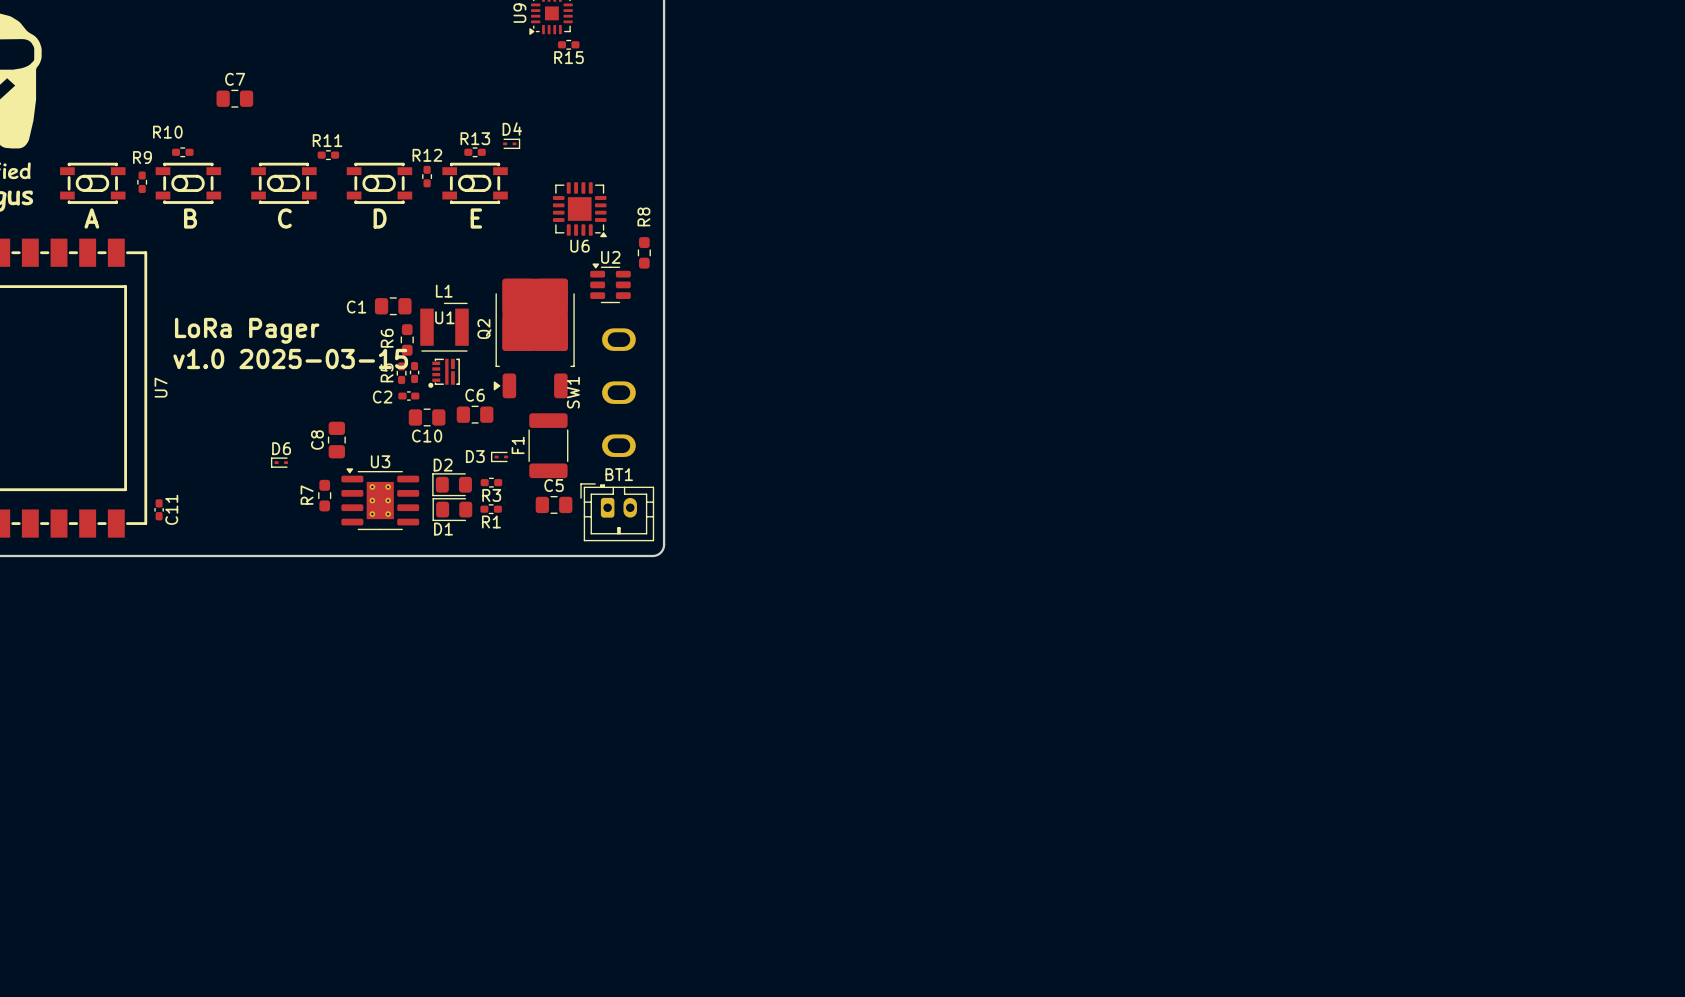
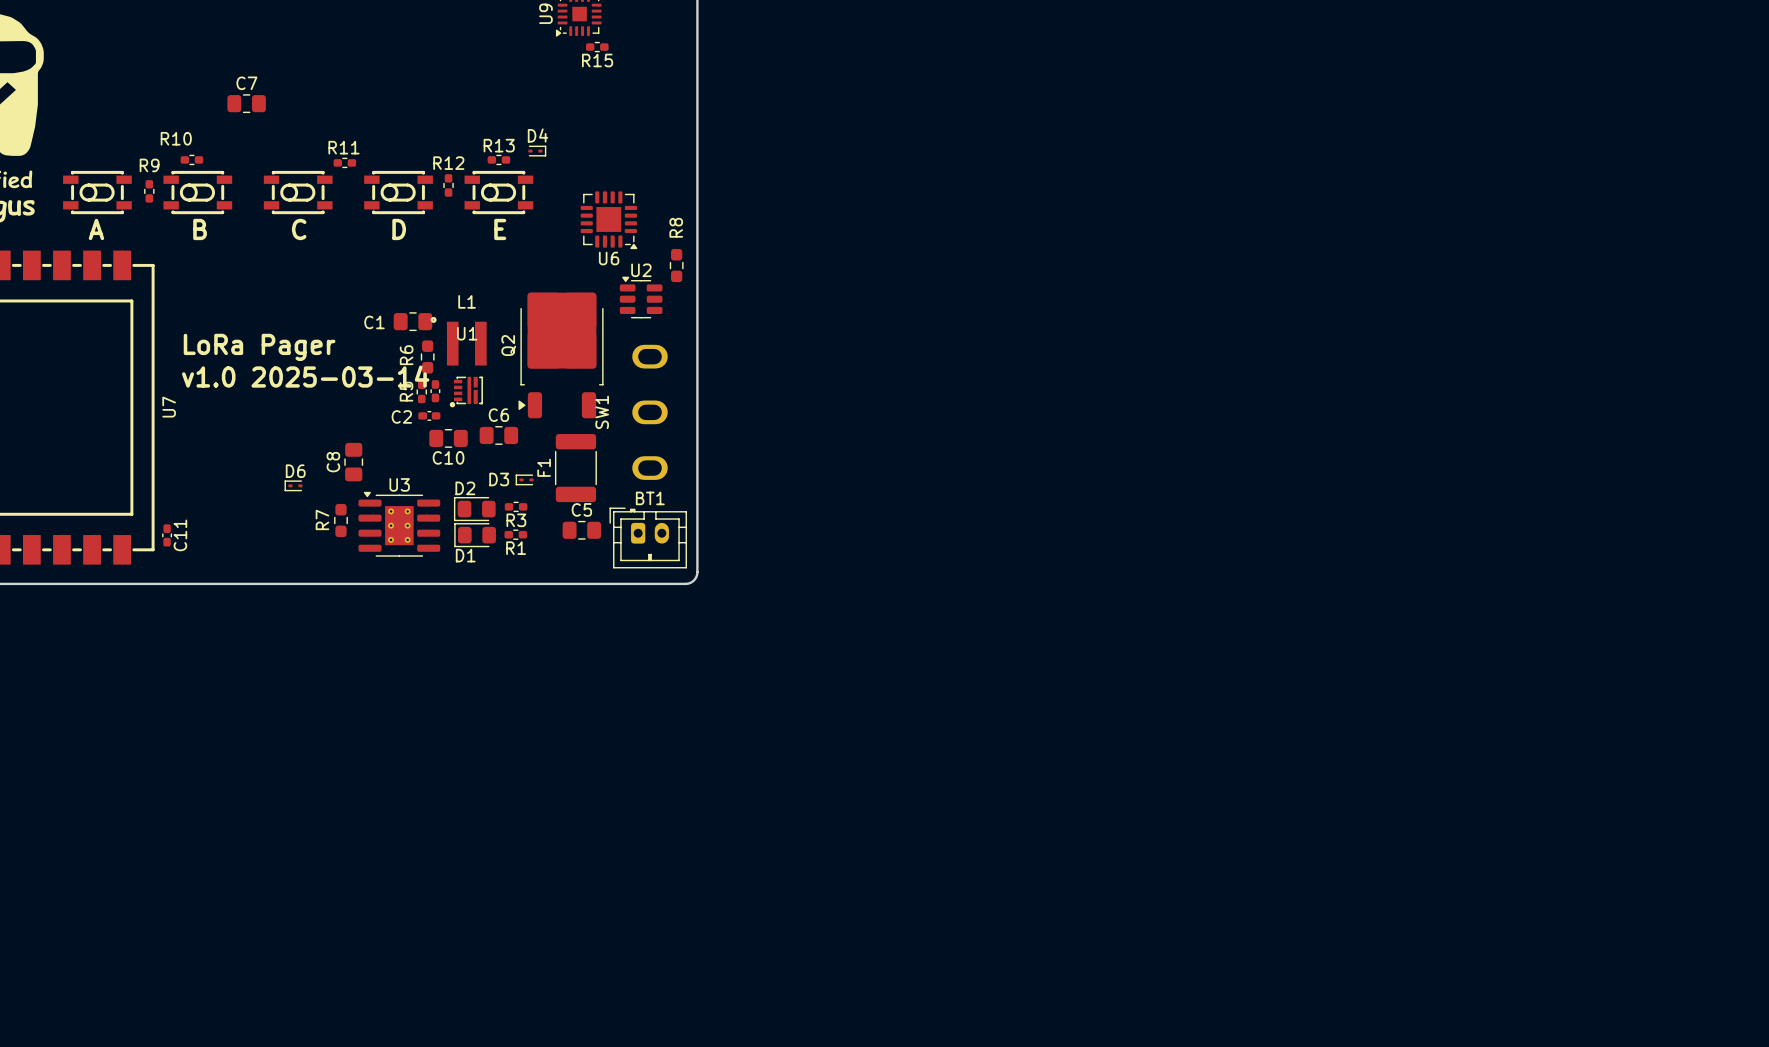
L1 footprint: [420, 302, 469, 352] -> [430, 316, 487, 366]
text: v1.0 2025-03-15 (290, 358) -> v1.0 2025-03-14 (305, 376)

